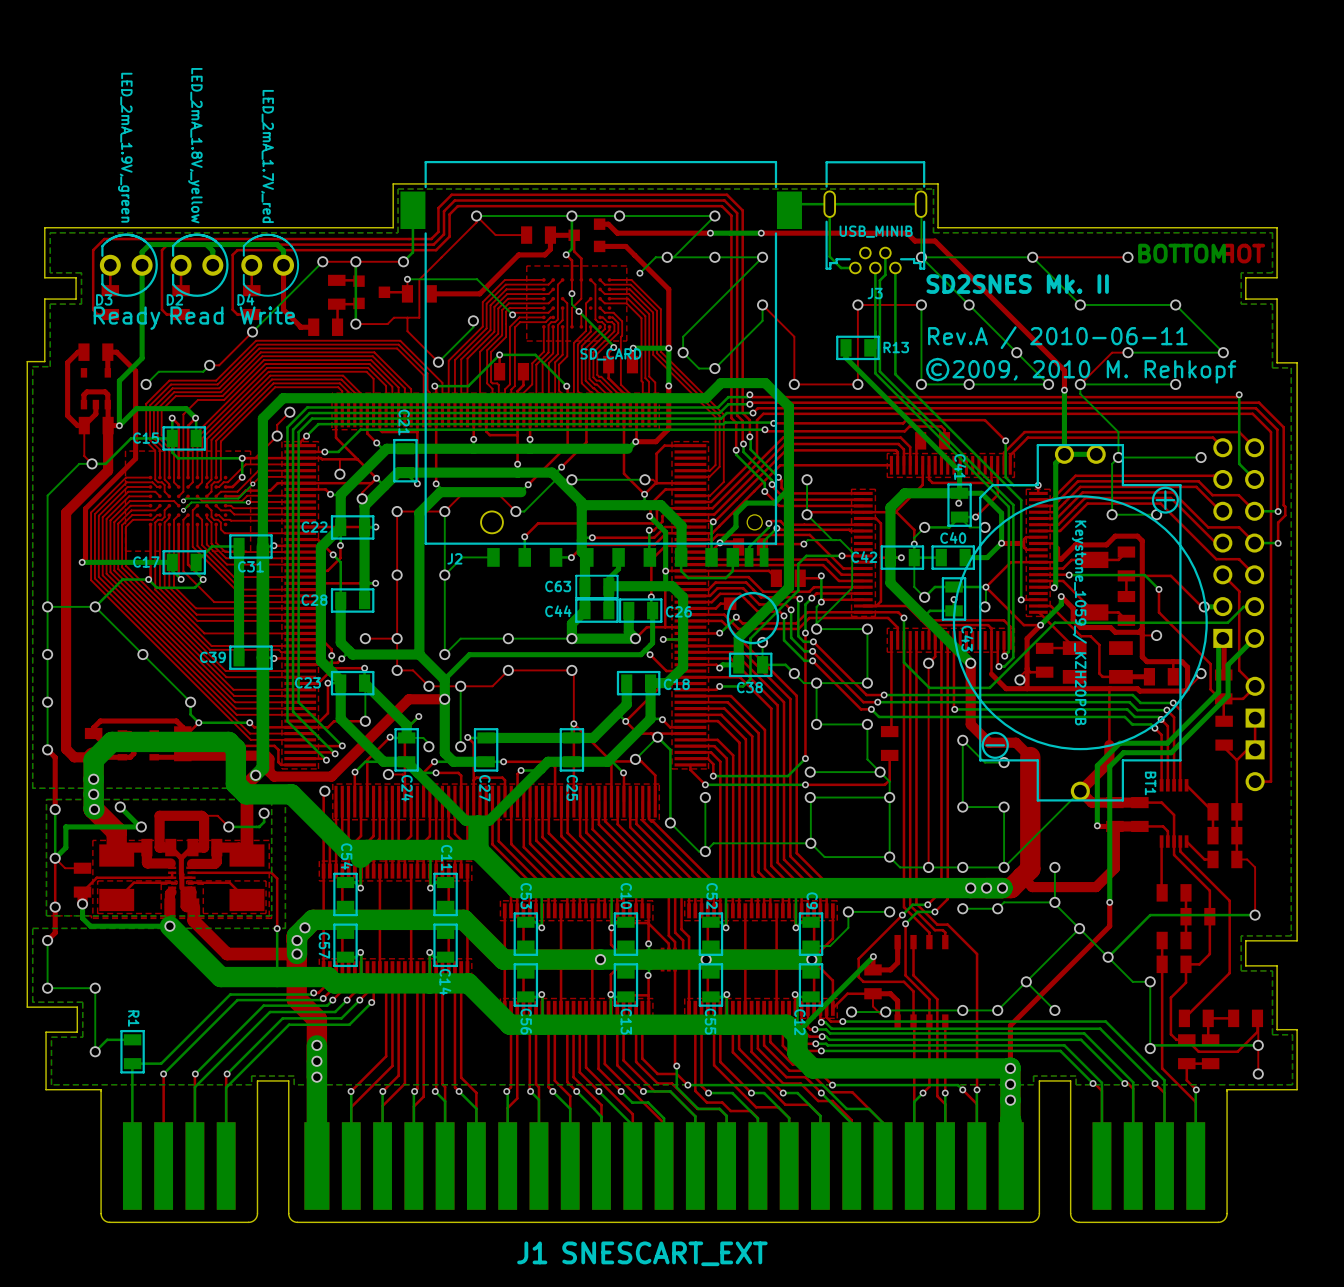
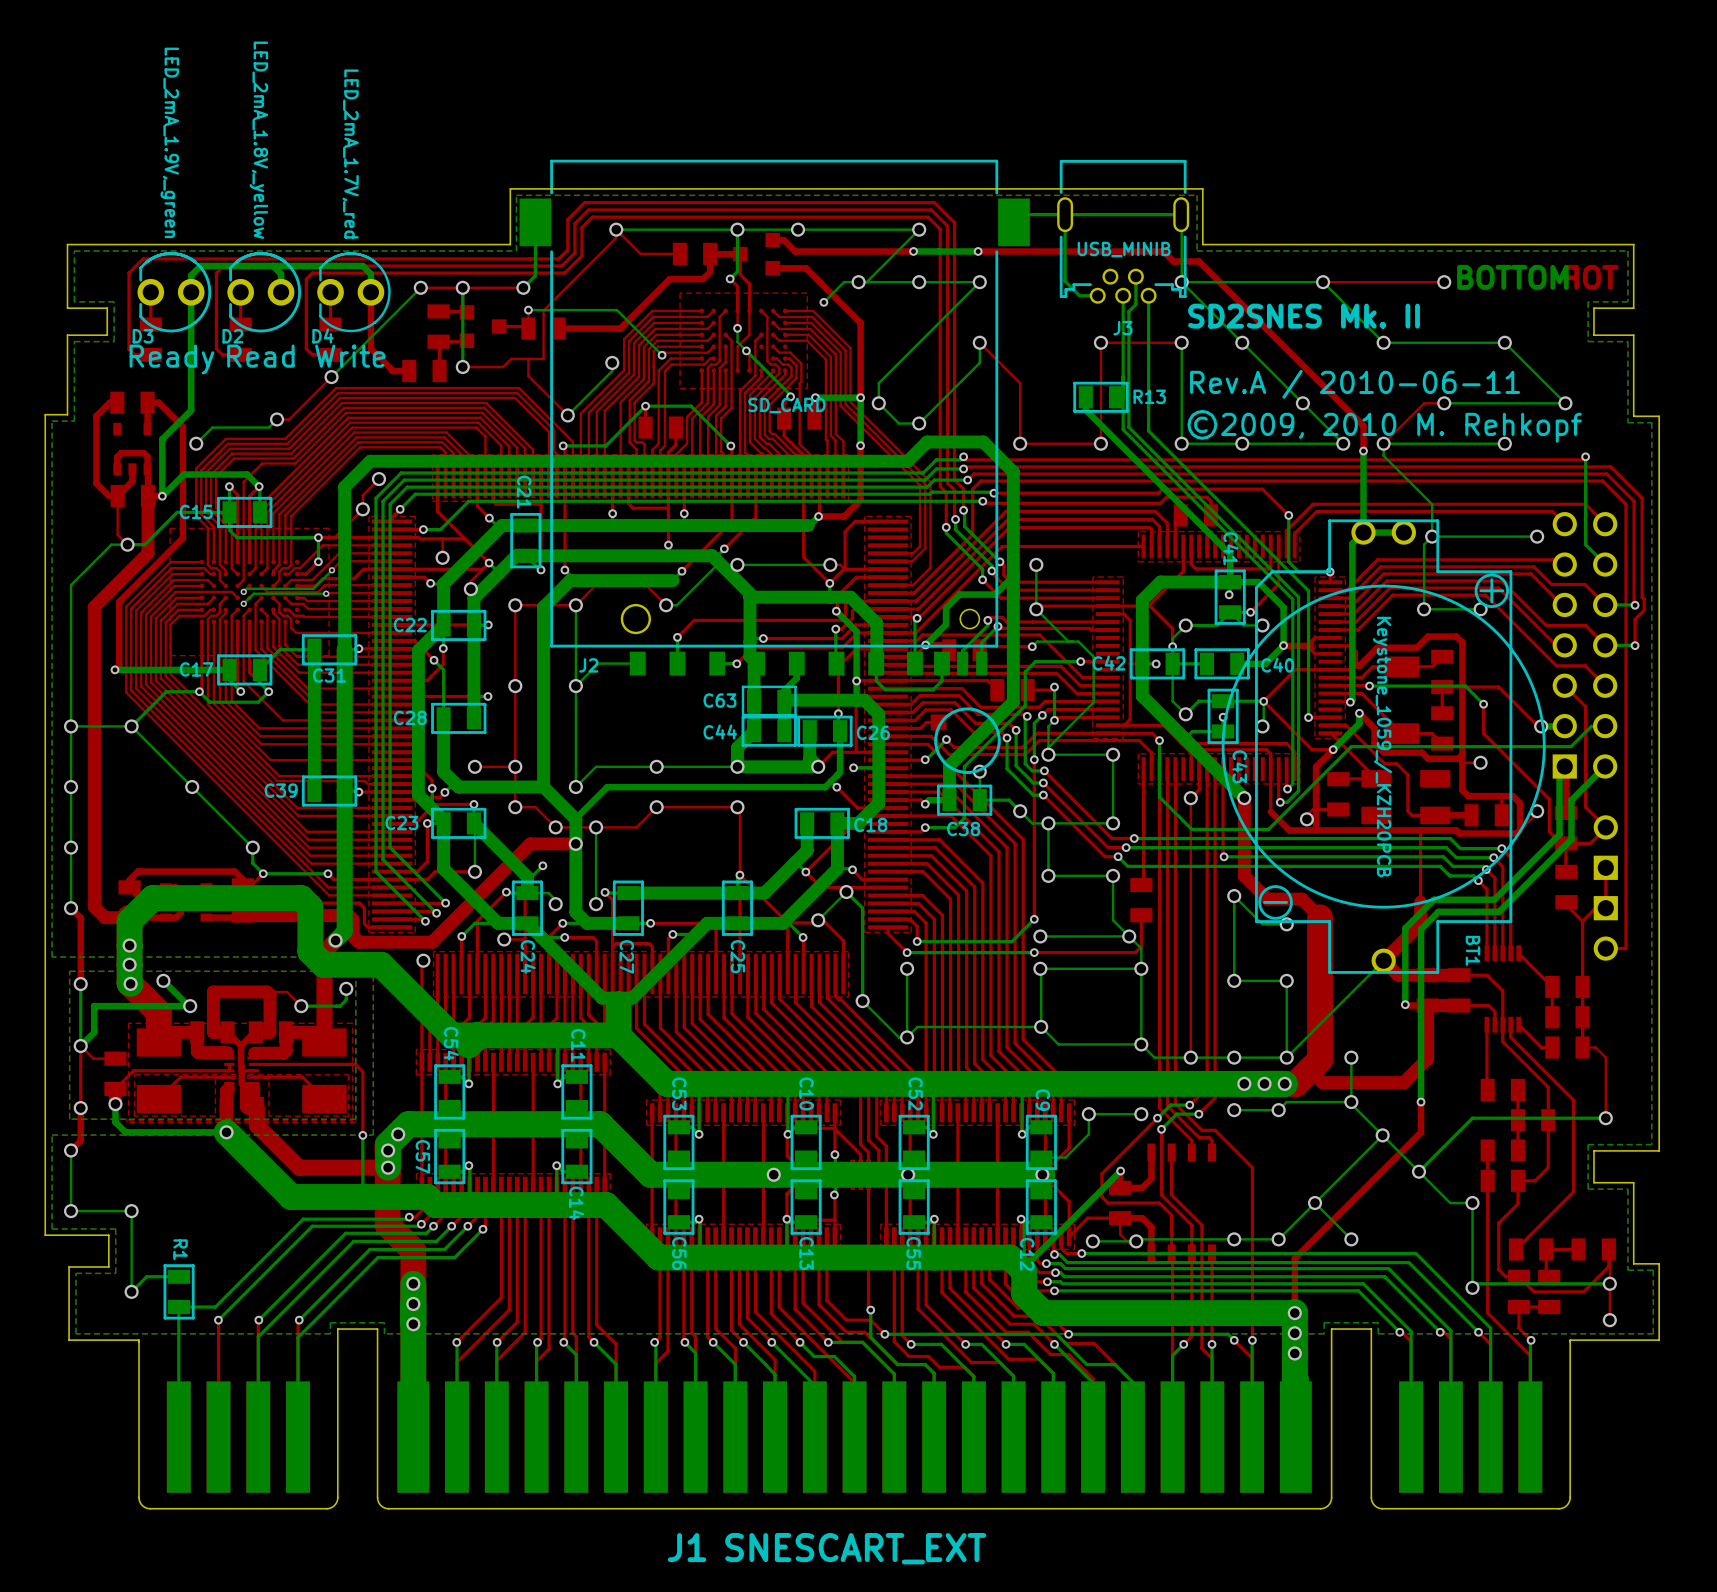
C40 name position: C40 (953, 537) -> C40 (1277, 665)

